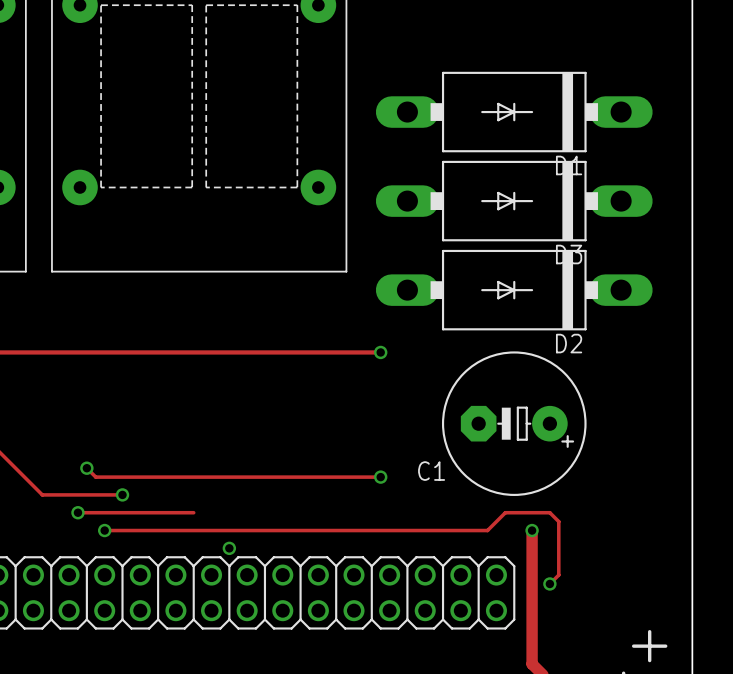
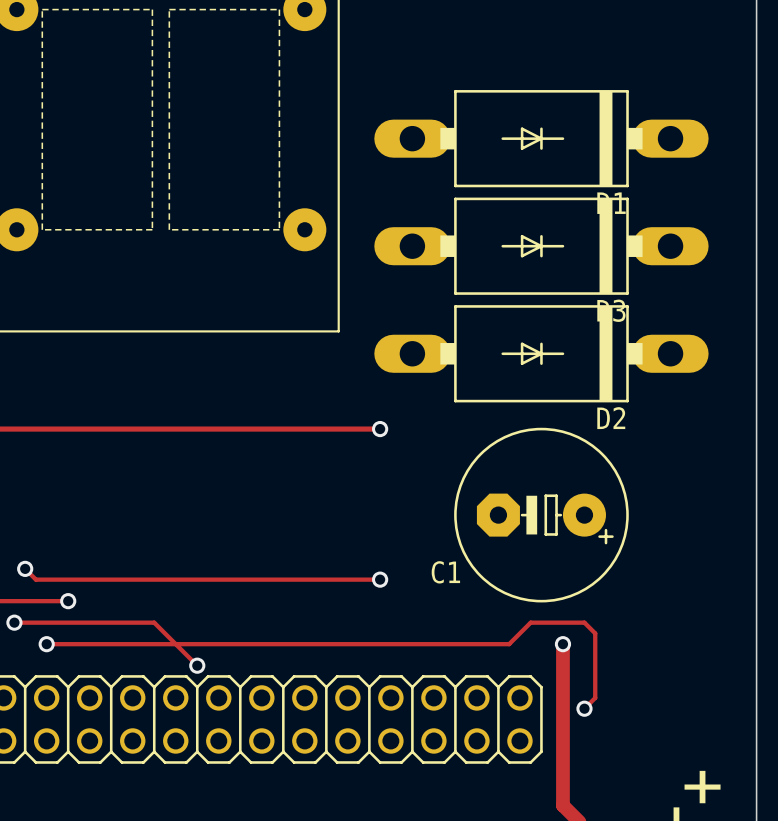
track: none -> (154, 622) (197, 665)

